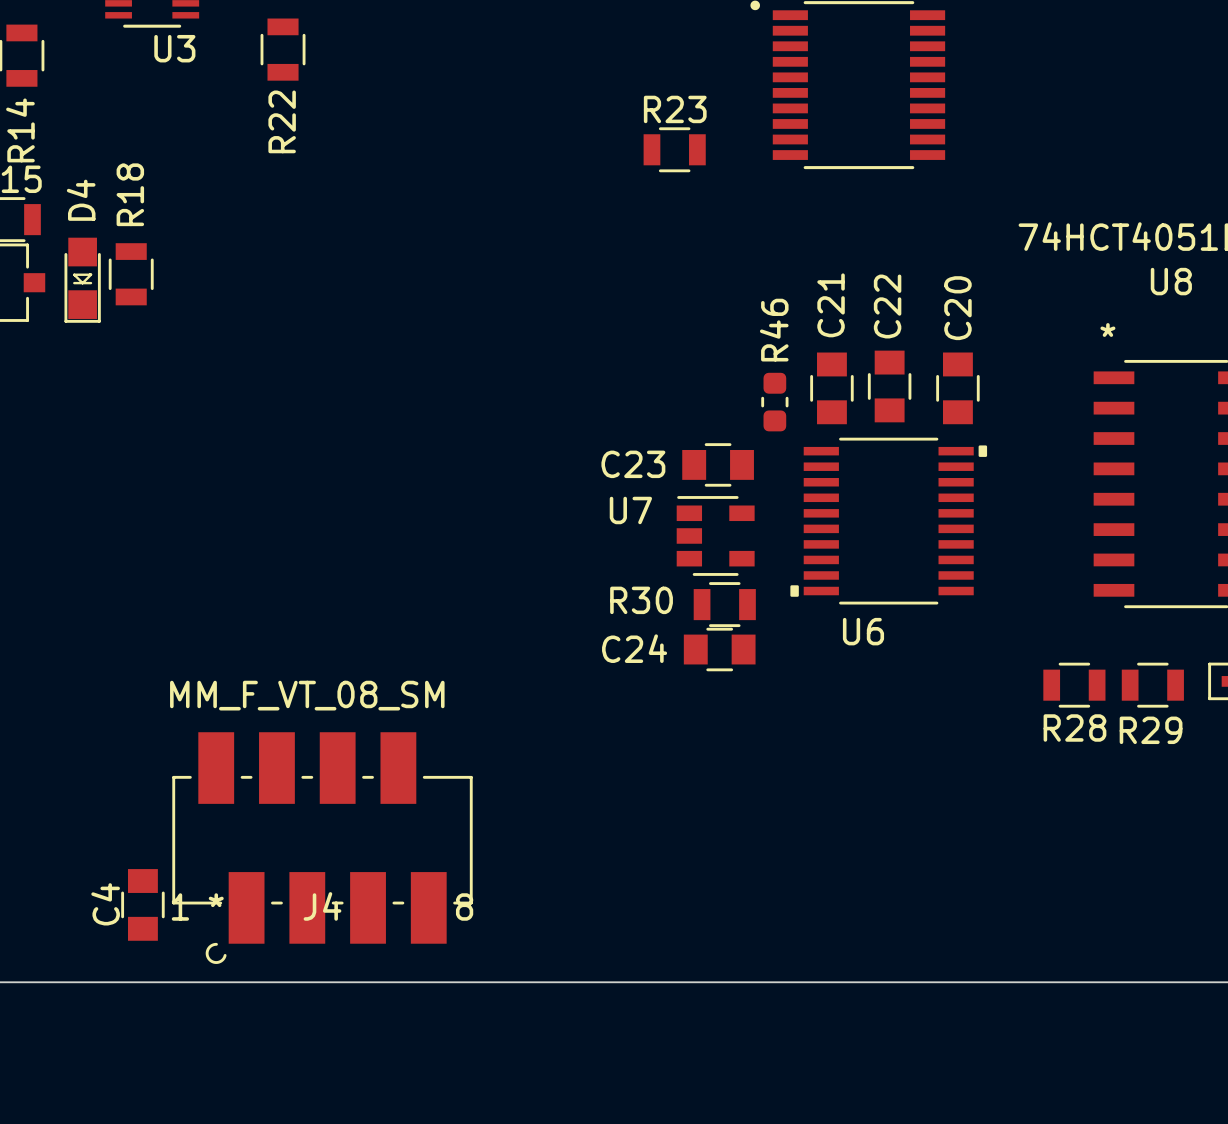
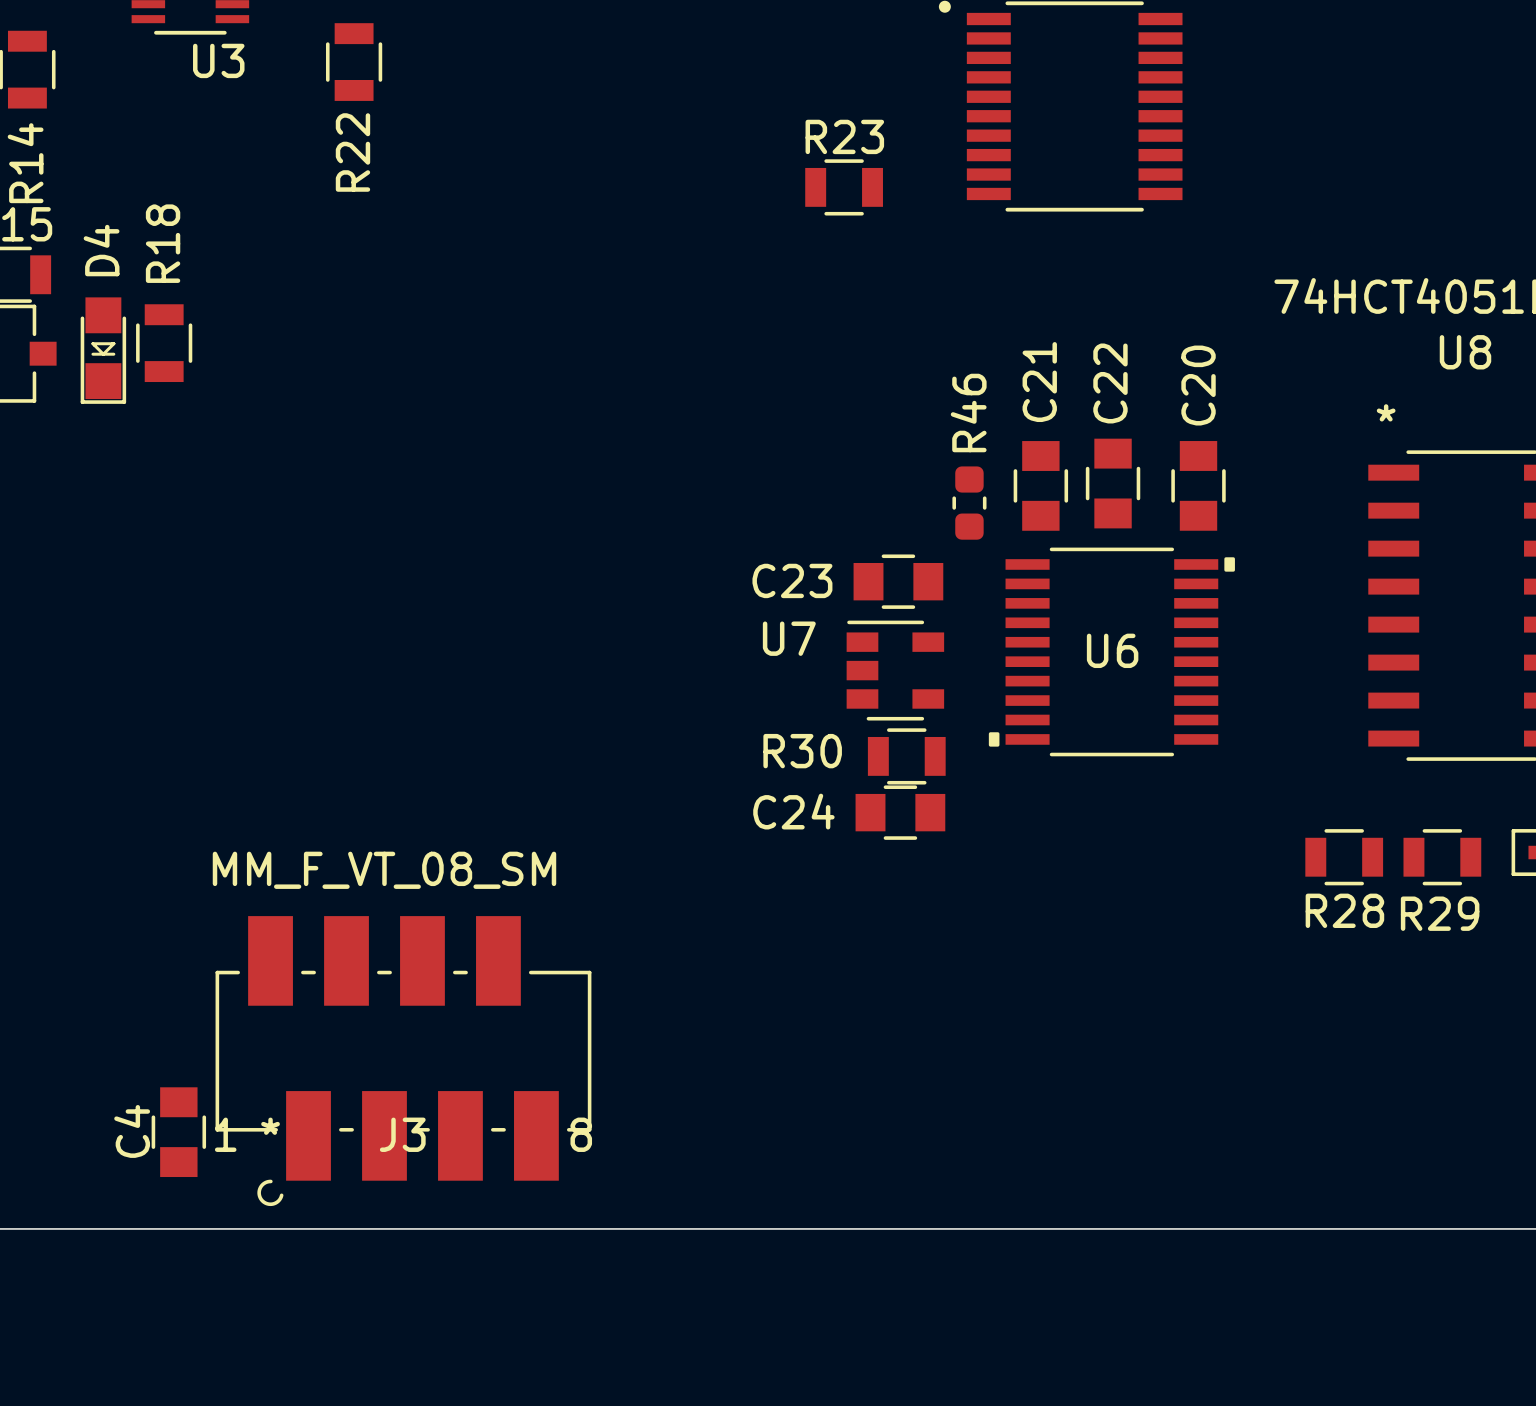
U6 name position: U6 (863, 631) -> U6 (1112, 650)
J4 name: J4 (322, 906) -> J3 (402, 1134)

